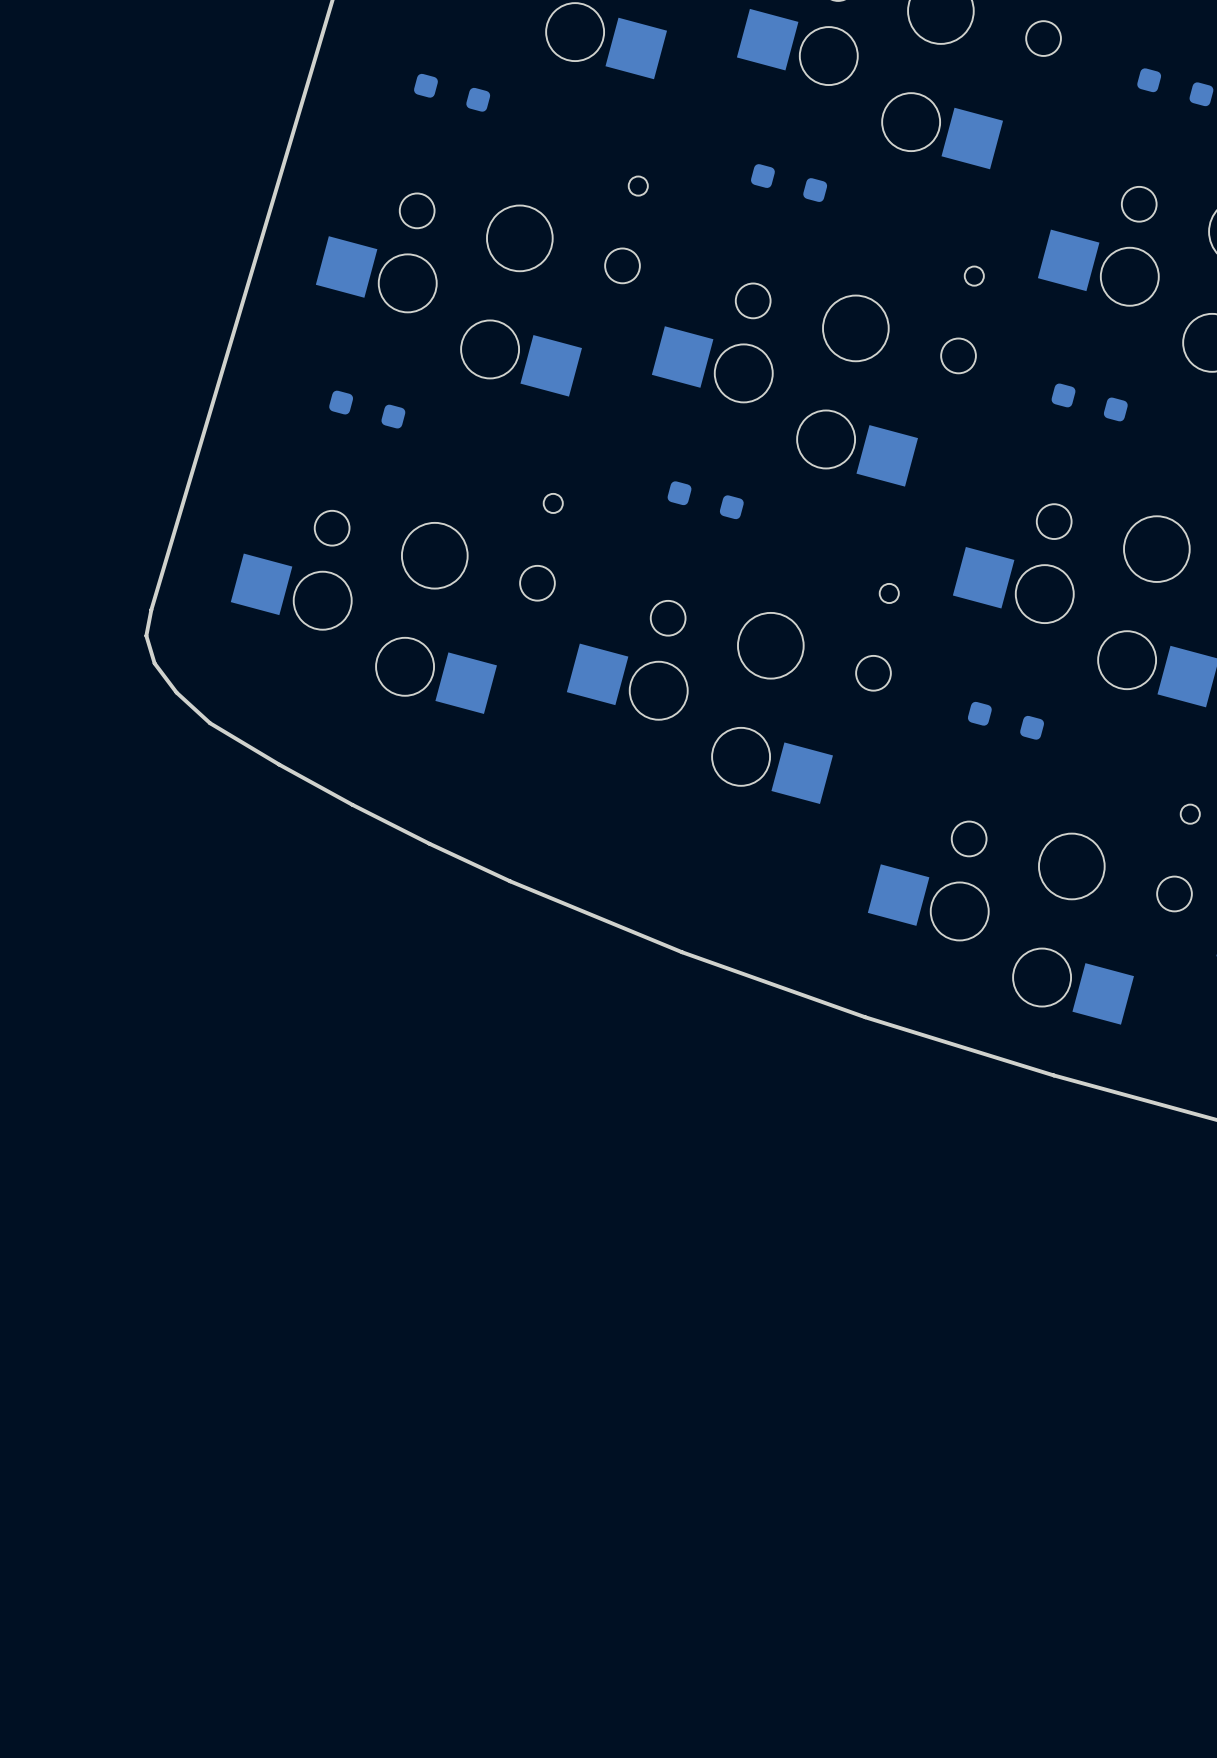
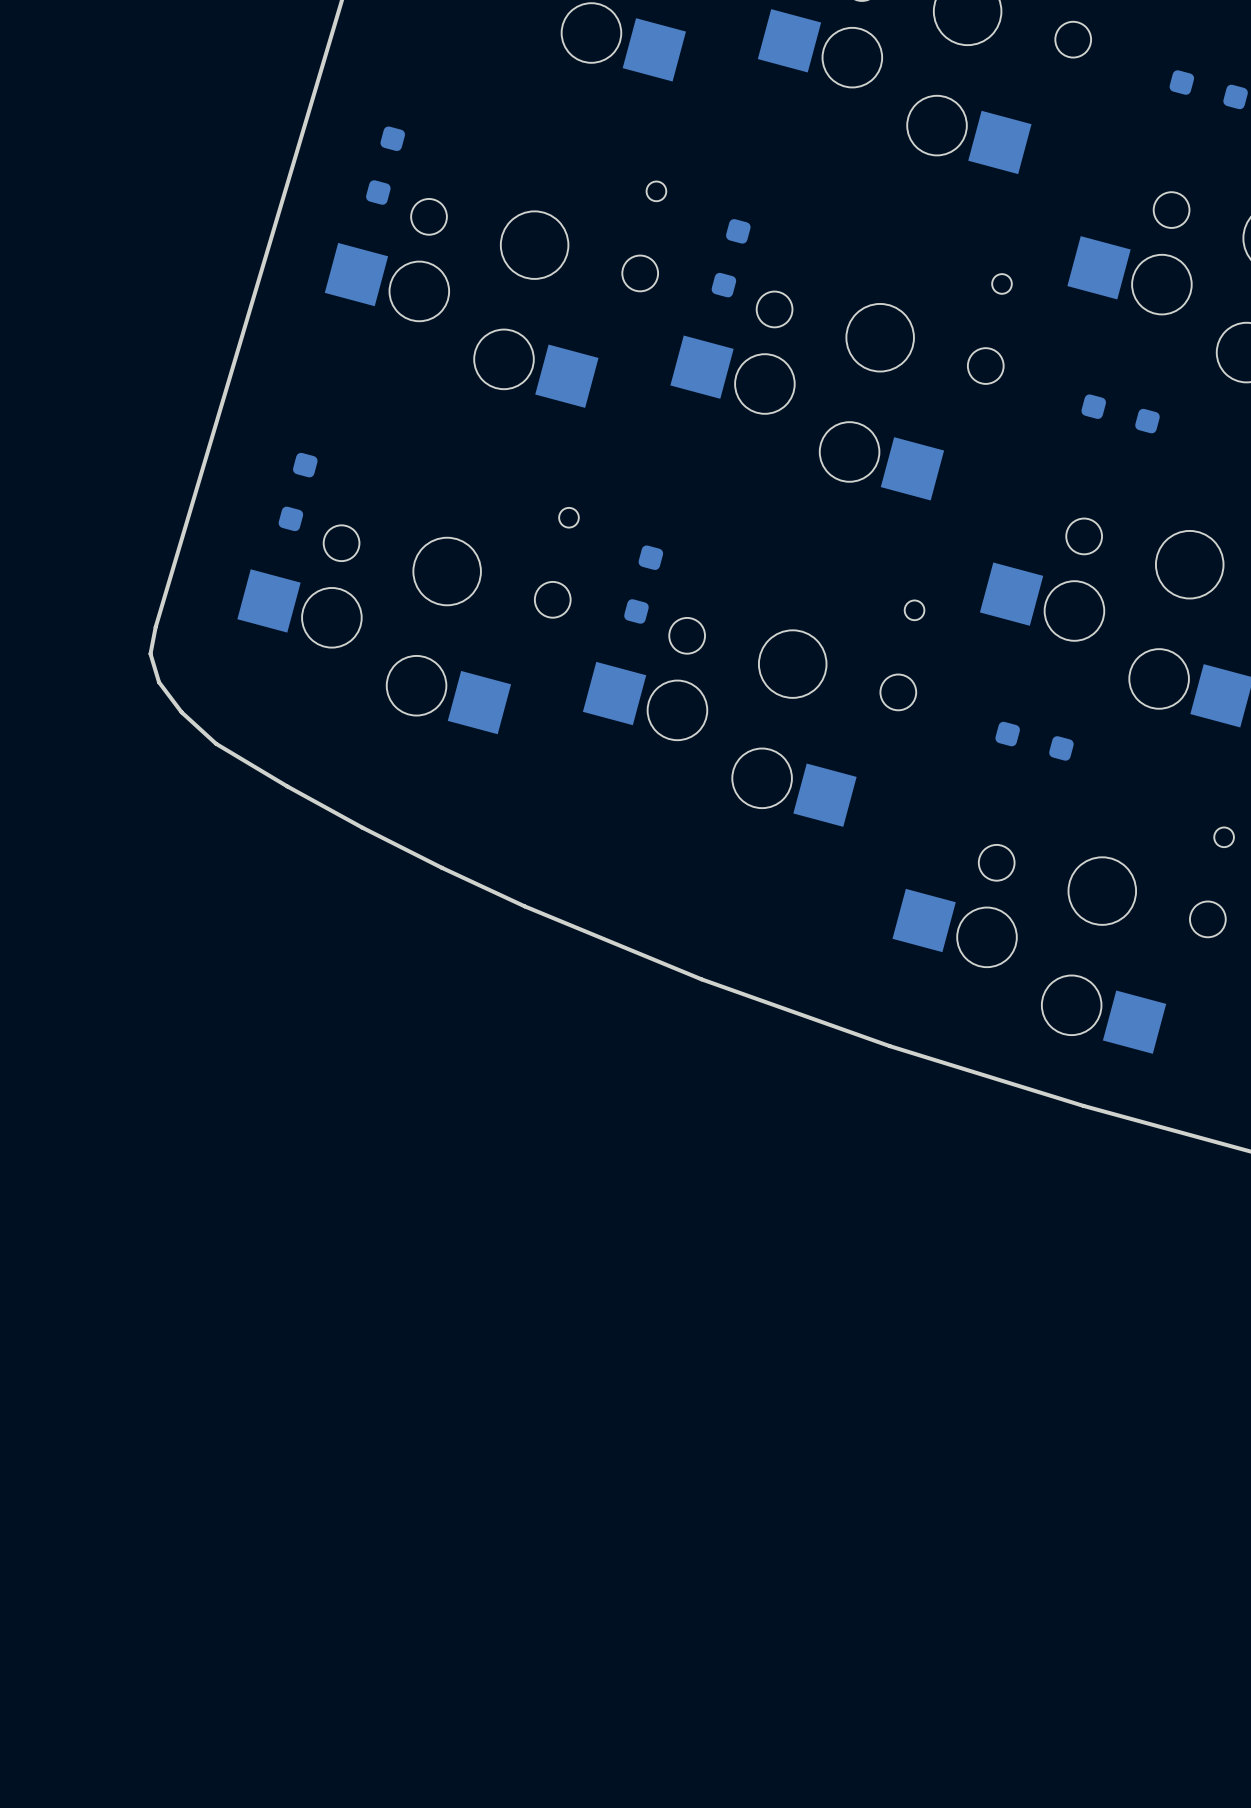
part rotation: 0° (452, 92) -> 90° clockwise (385, 165)
part position: (452, 92) -> (385, 165)
part rotation: 0° (789, 183) -> 90° clockwise (731, 258)
part position: (789, 183) -> (731, 258)
part rotation: 0° (367, 409) -> 90° clockwise (298, 492)
part position: (367, 409) -> (298, 492)
part rotation: 0° (705, 500) -> 90° clockwise (643, 584)
part position: (705, 500) -> (643, 584)

